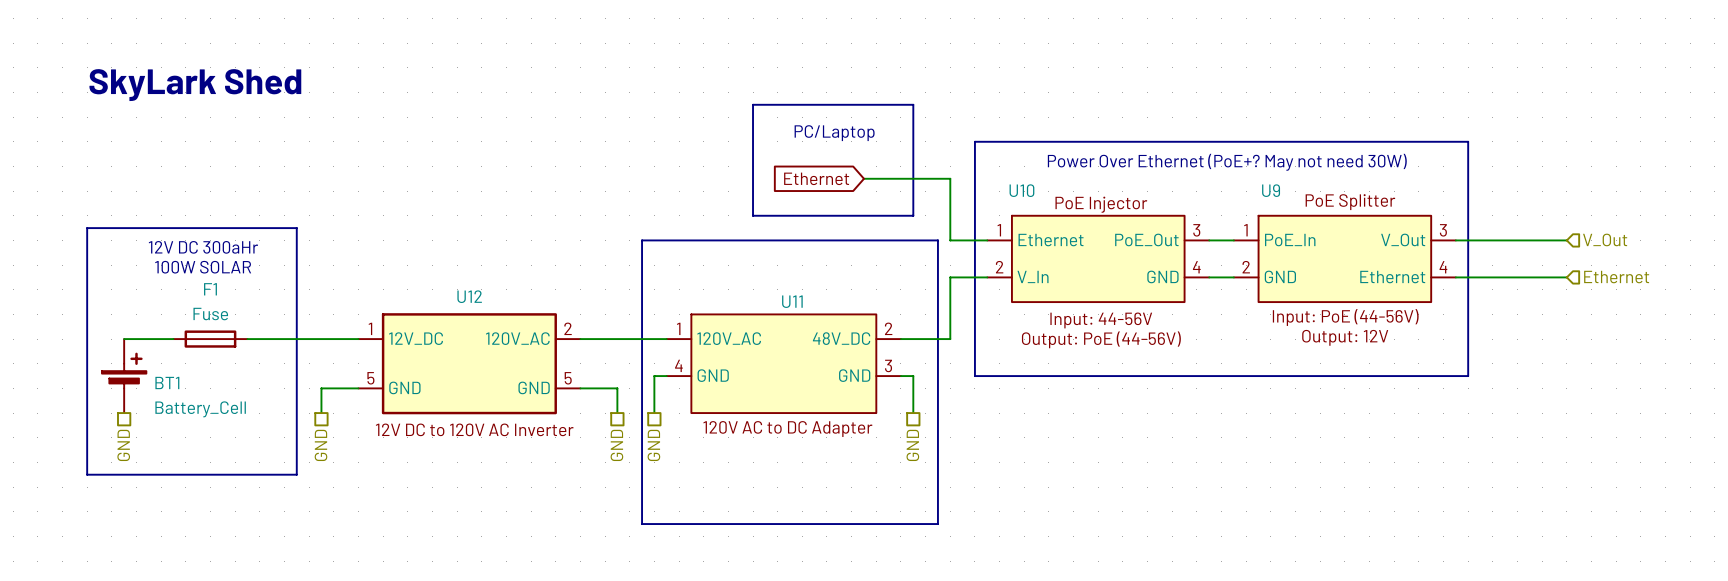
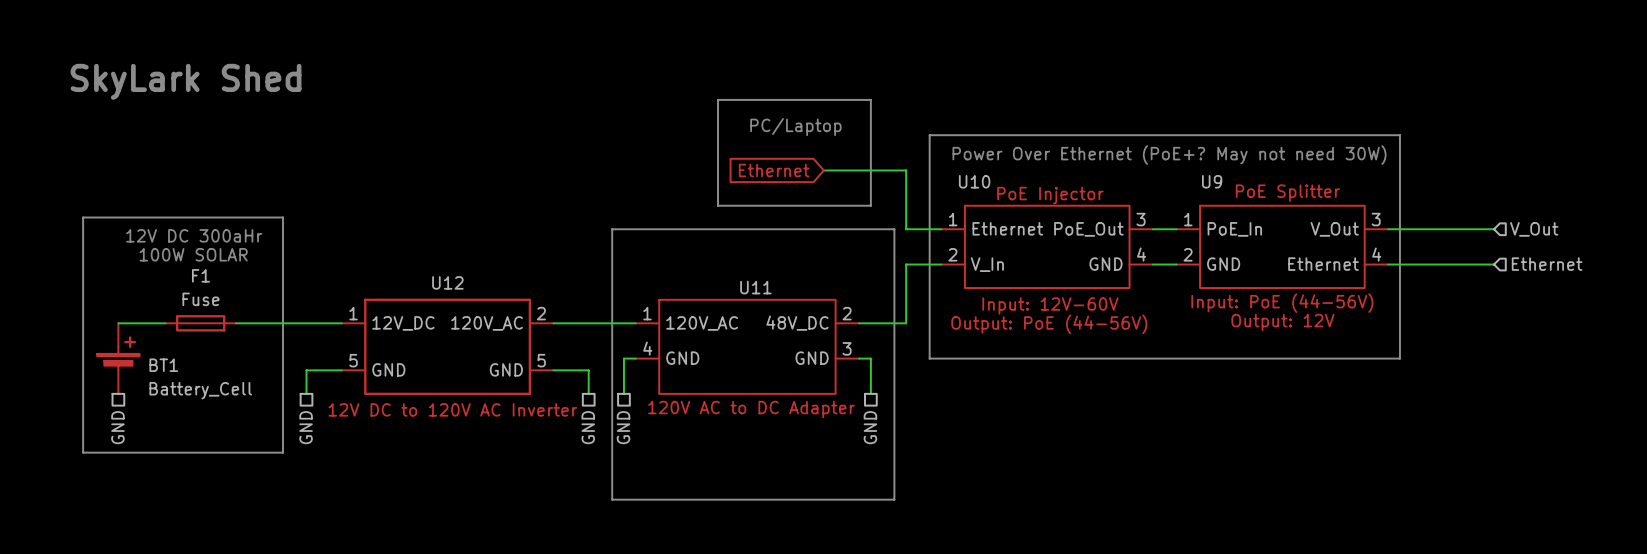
U10 text: Input: 44-56V (1101, 320) -> Input: 12V-60V (1050, 305)

